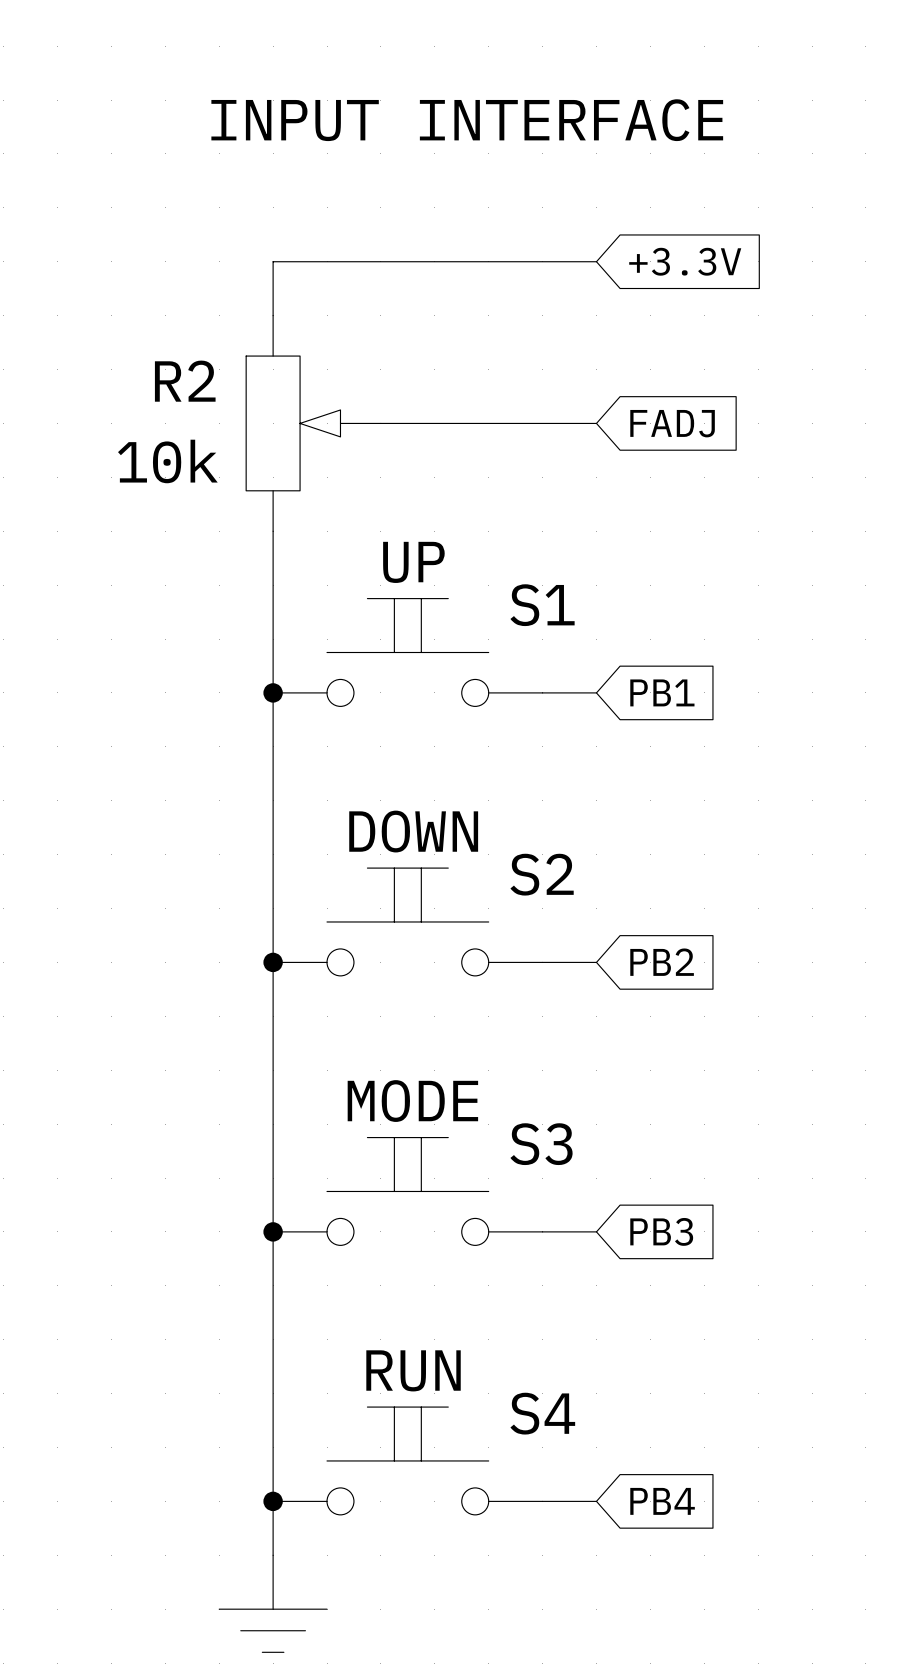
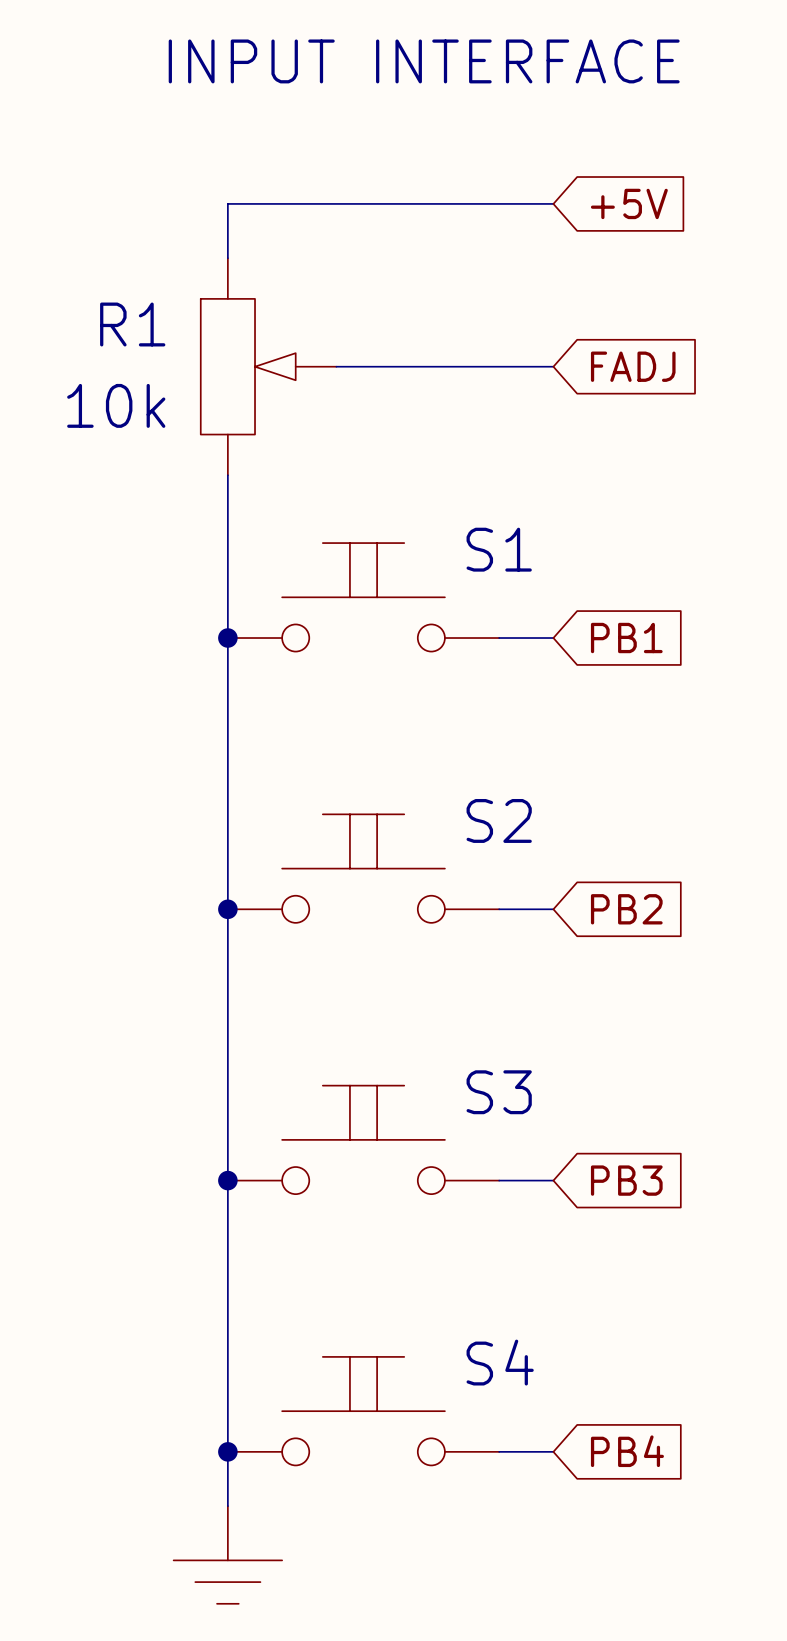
global label: +3.3V (685, 261) -> +5V (629, 203)
R2 name: R2 (185, 381) -> R1 (132, 324)
S1 text: UP (413, 562) -> none
S2 text: DOWN (413, 831) -> none
S3 text: MODE (412, 1101) -> none
S4 text: RUN (413, 1370) -> none

